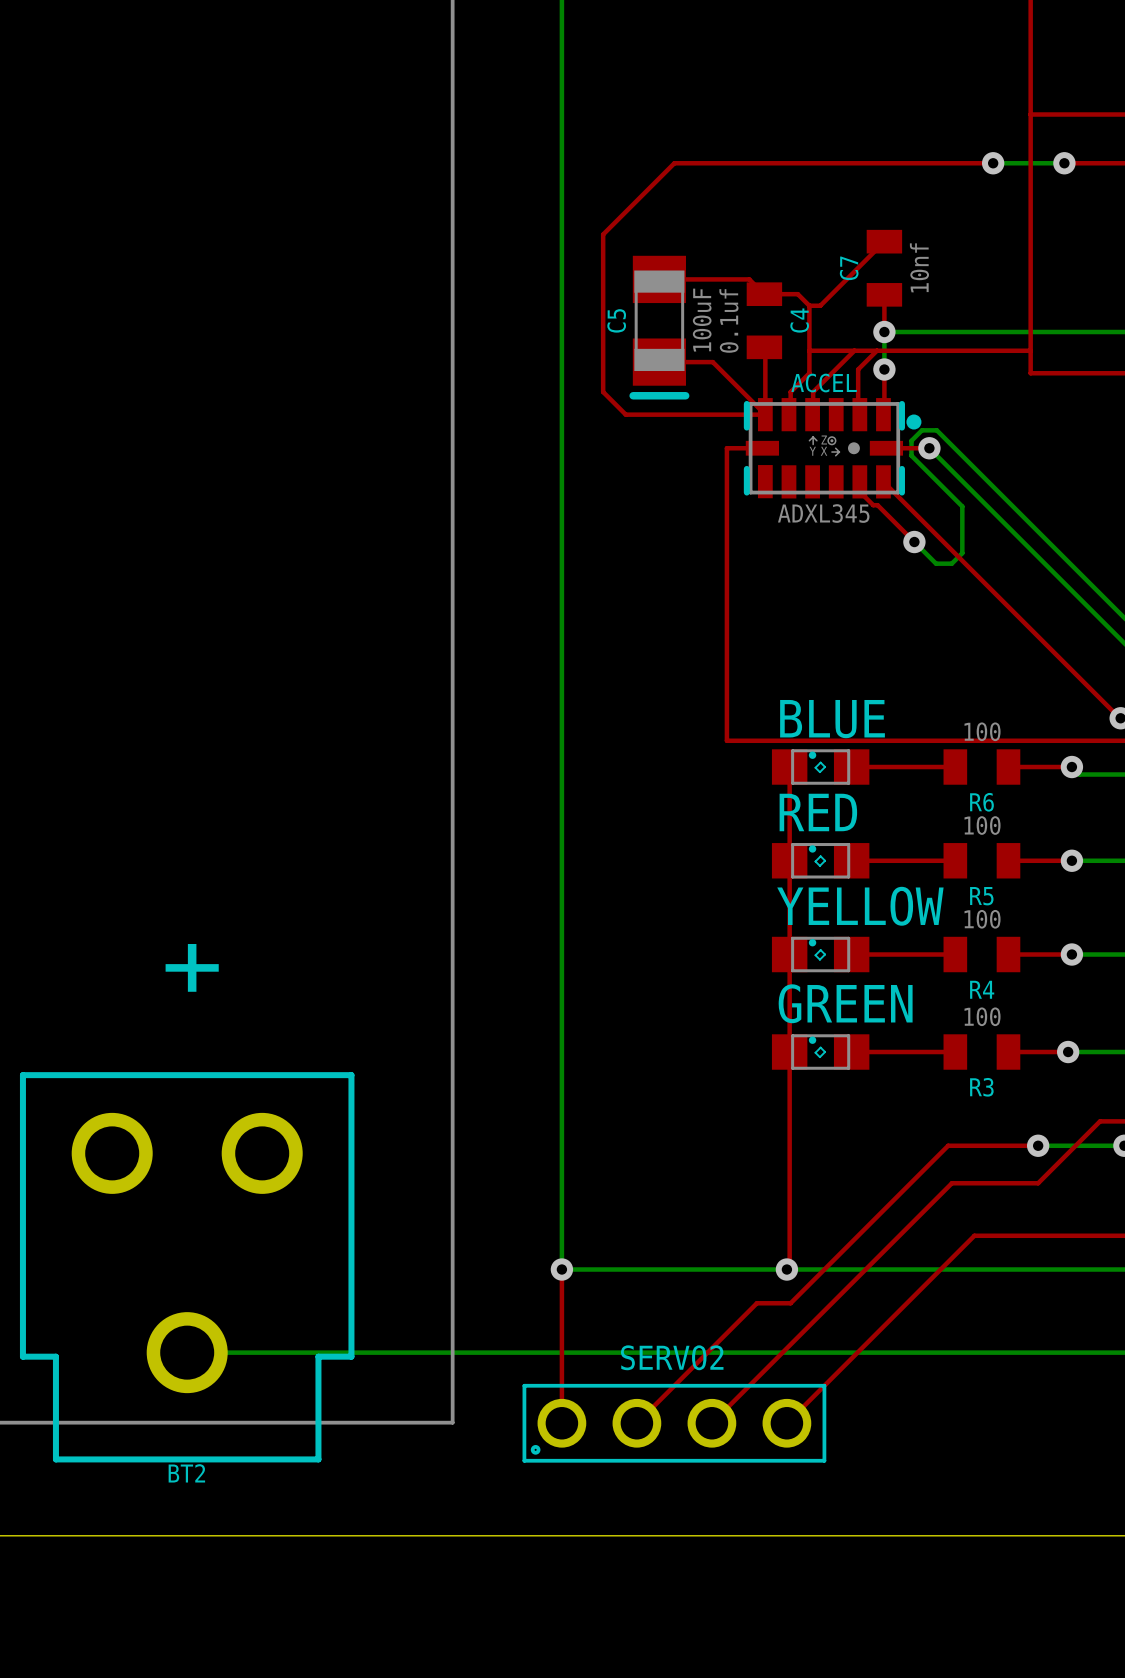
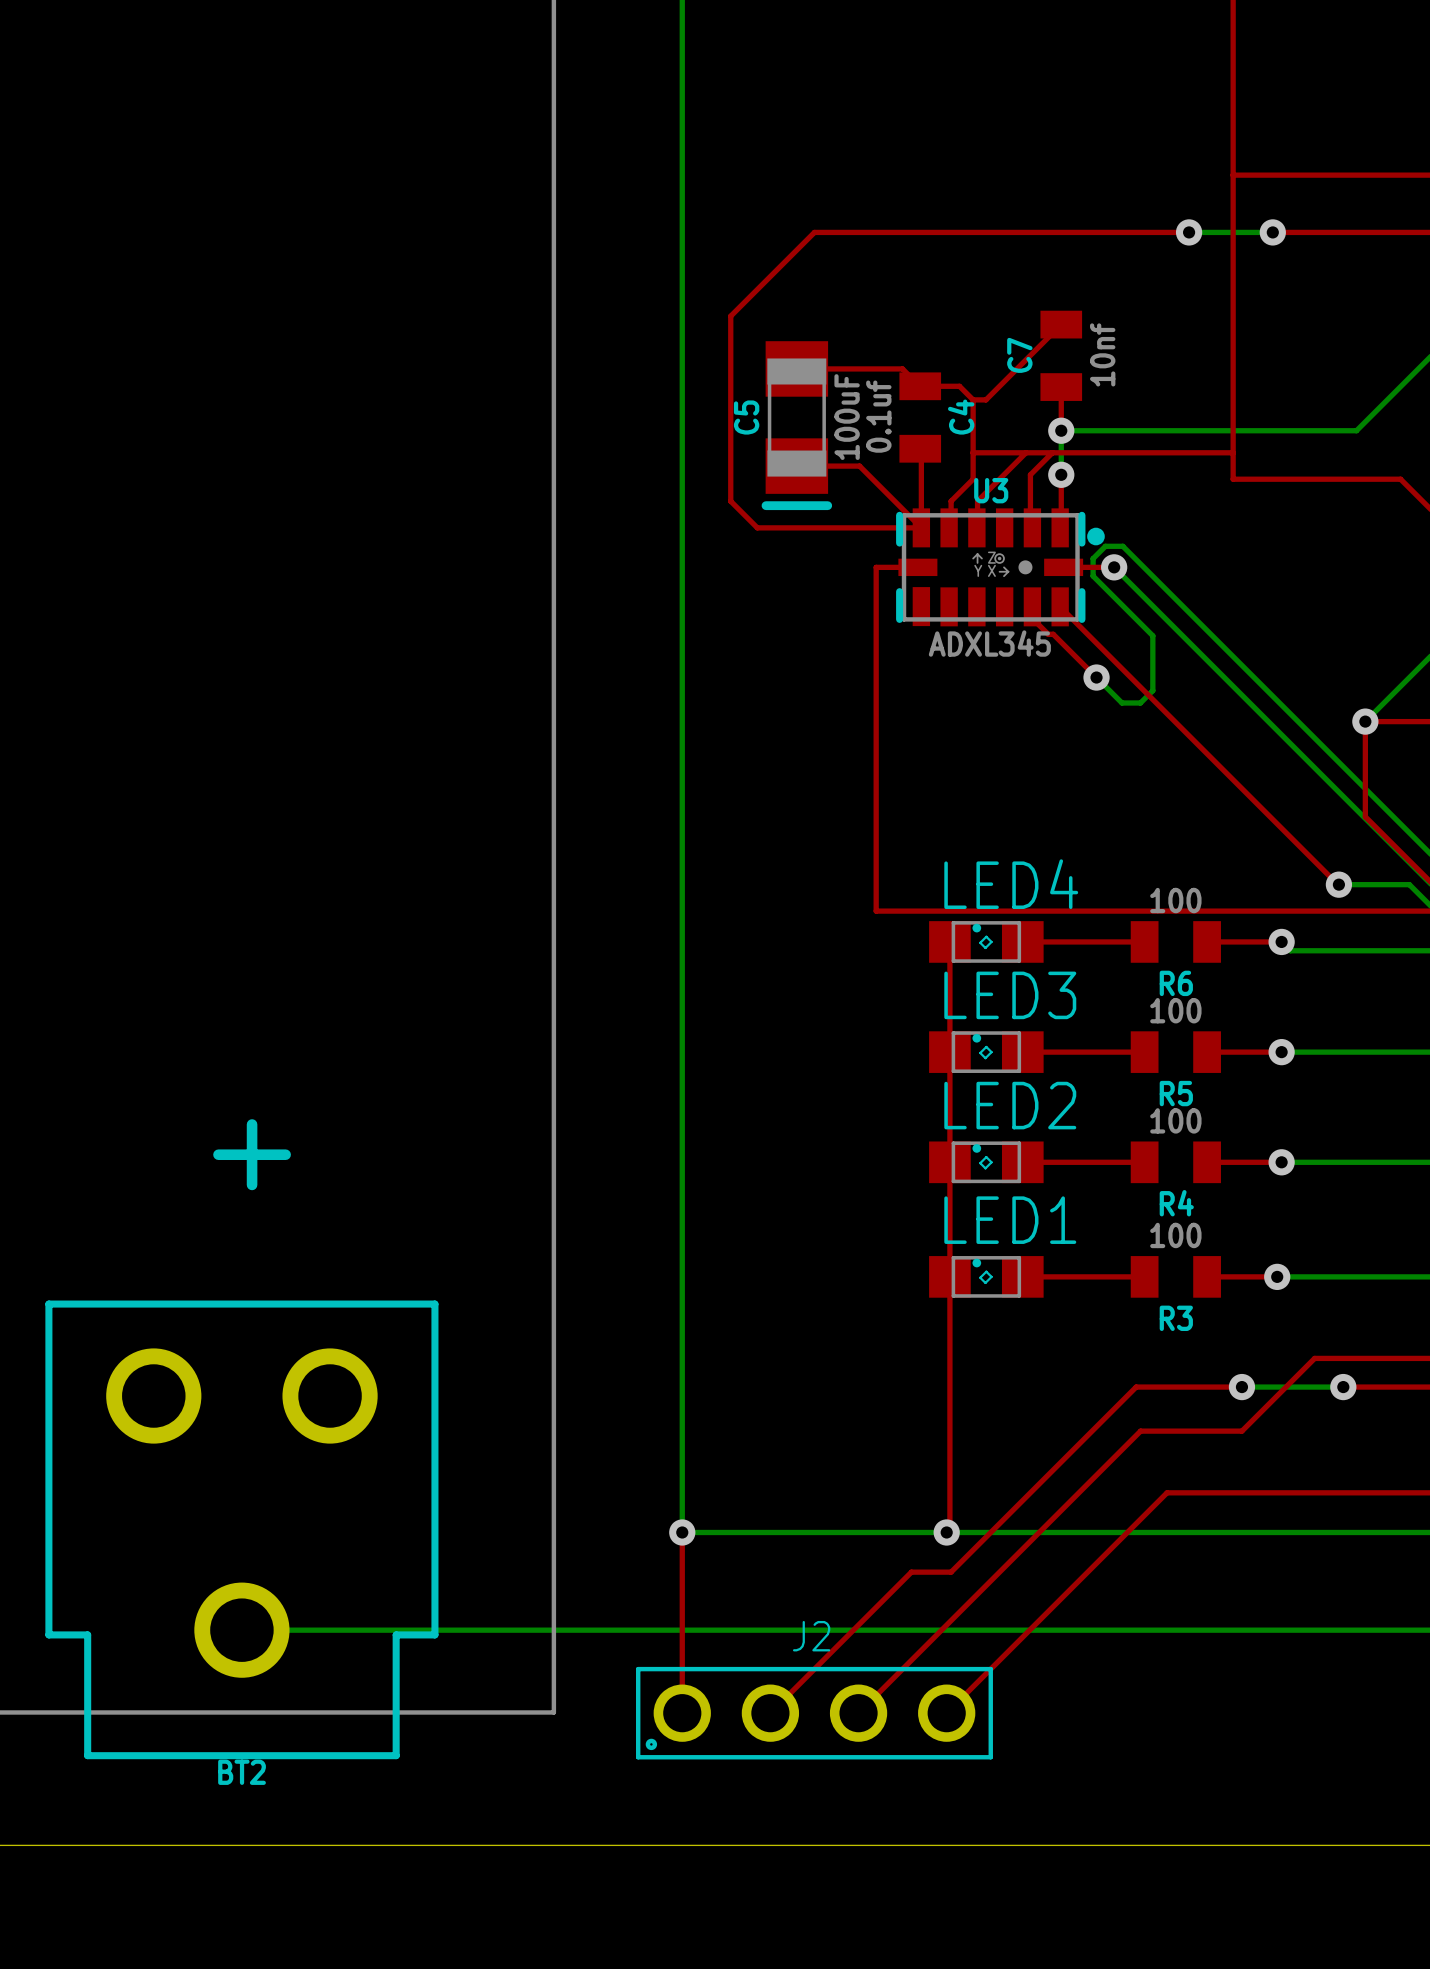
ACCEL name: ACCEL (824, 383) -> U3 (991, 490)
BLUE name: BLUE (832, 719) -> LED4 (1011, 884)
RED name: RED (818, 812) -> LED3 (1010, 995)
YELLOW name: YELLOW (860, 906) -> LED2 (1010, 1105)
GREEN name: GREEN (845, 1003) -> LED1 (1010, 1220)
SERVO2 name: SERVO2 (672, 1357) -> J2 (811, 1636)

